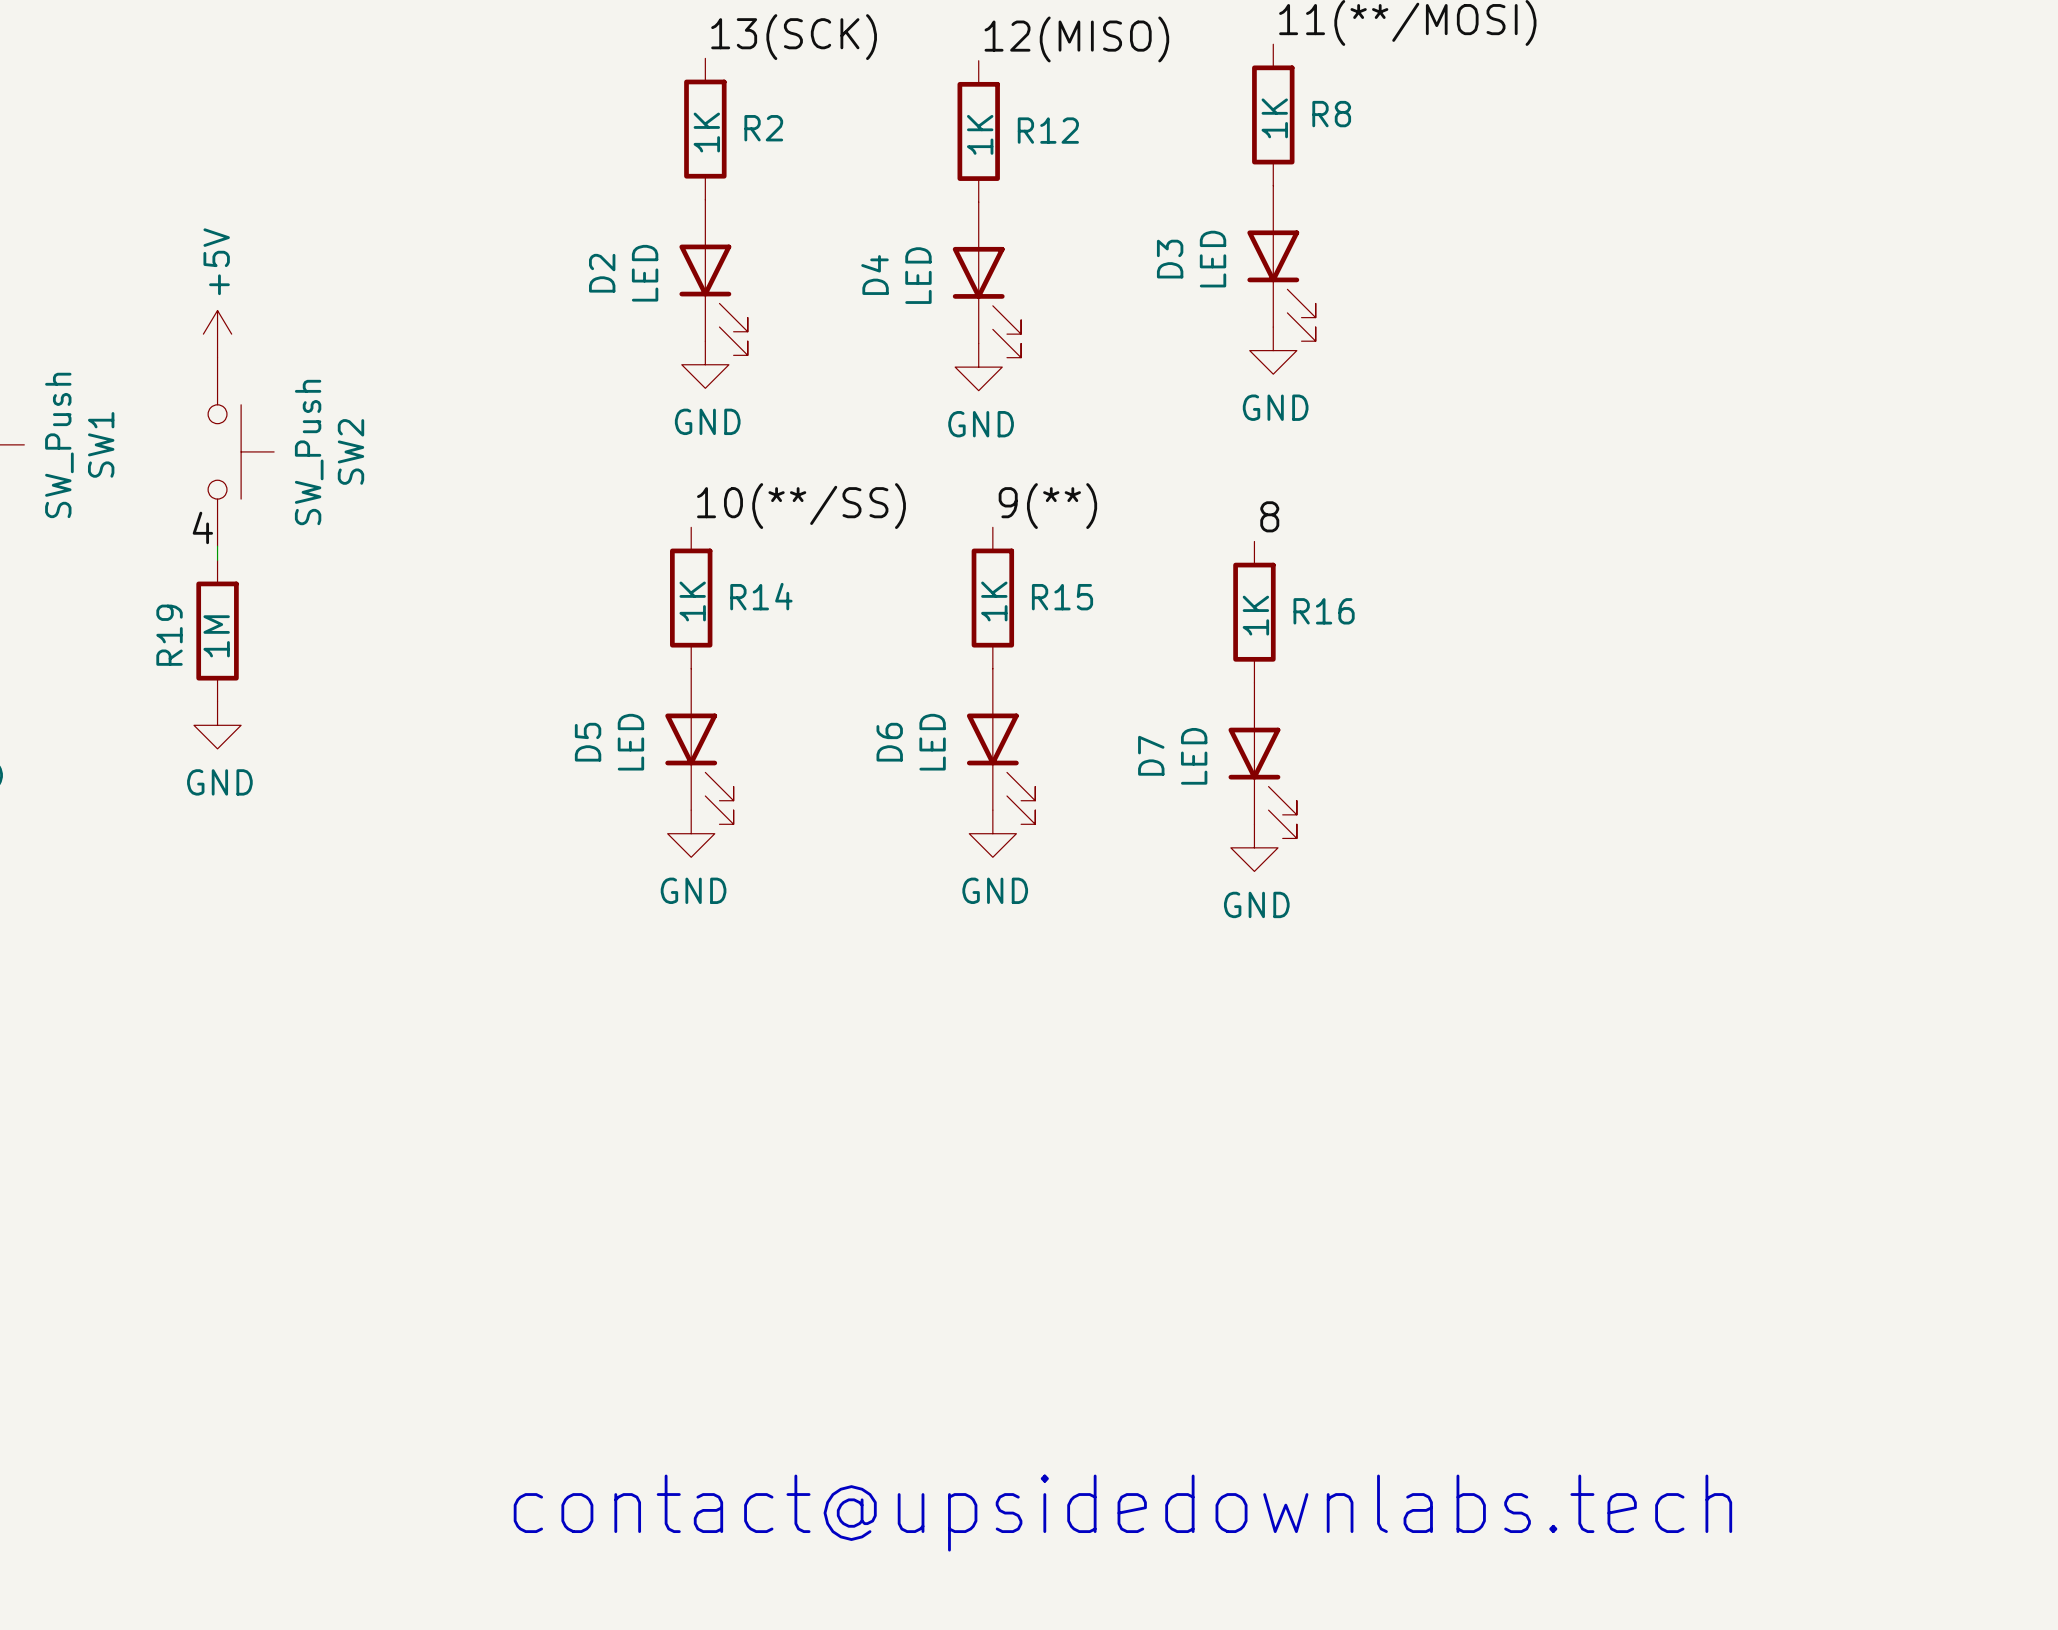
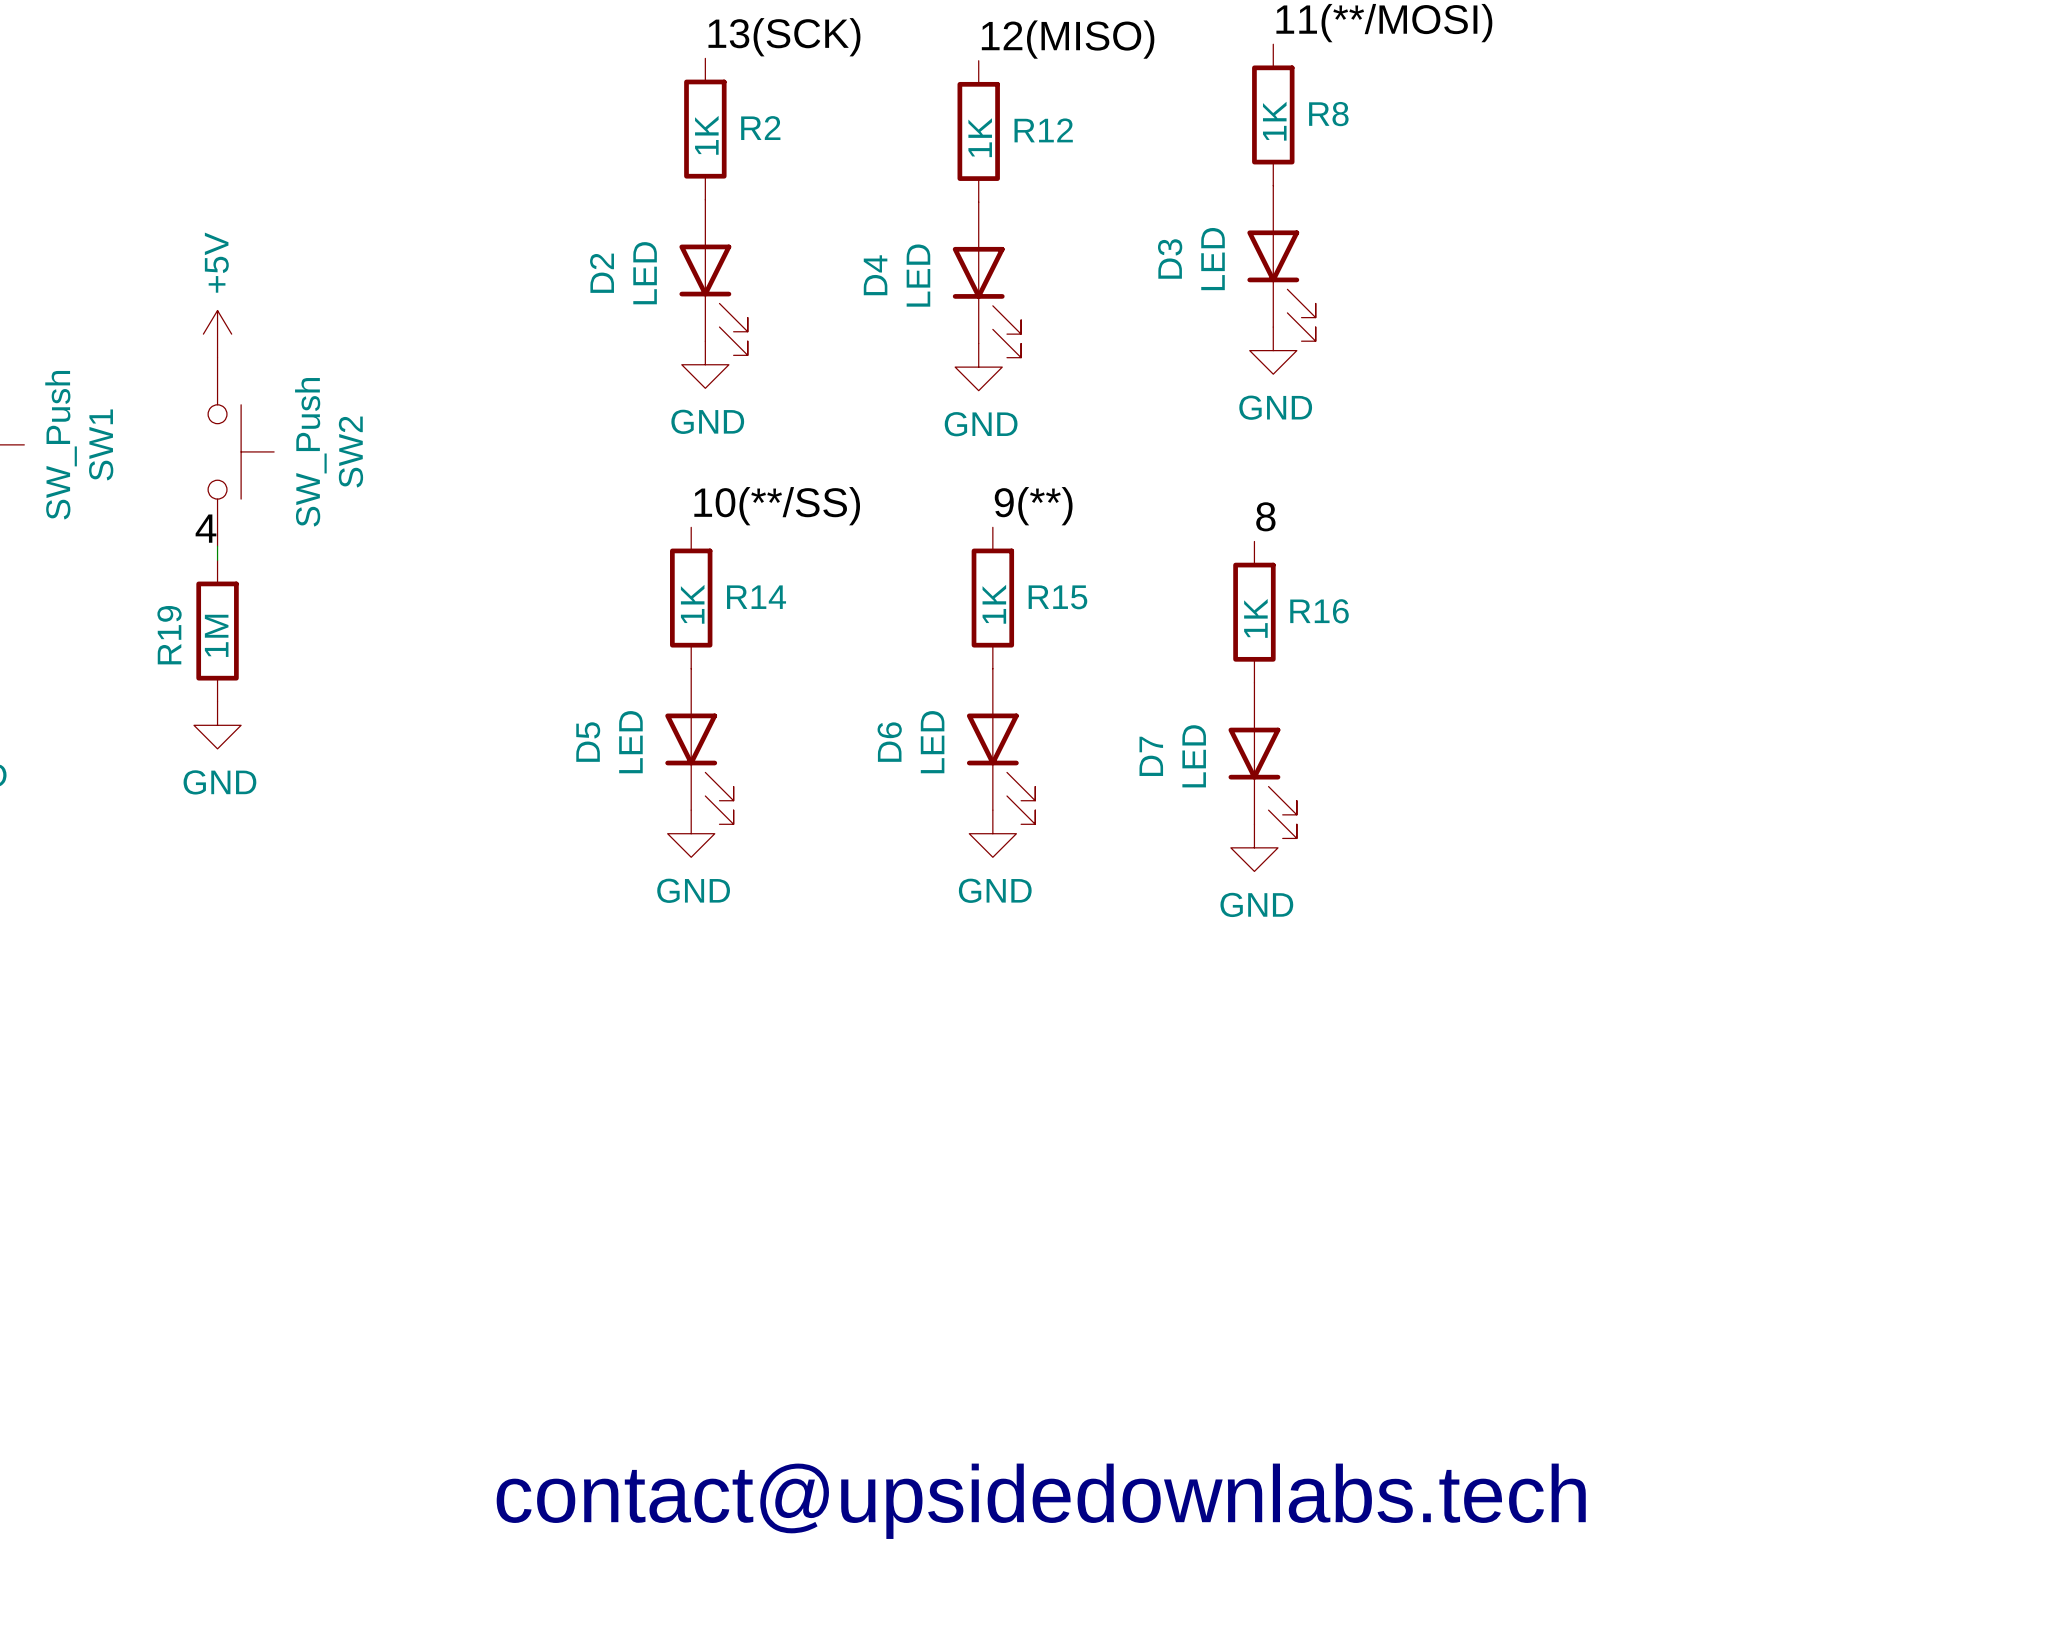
text position: contact@upsidedownlabs.tech (1122, 1513) -> contact@upsidedownlabs.tech (1041, 1501)

